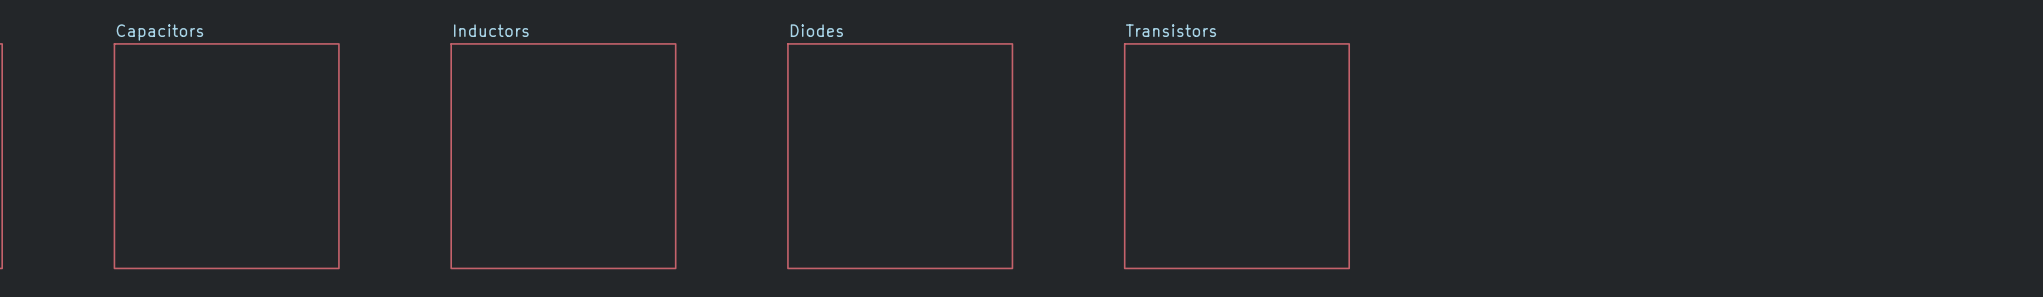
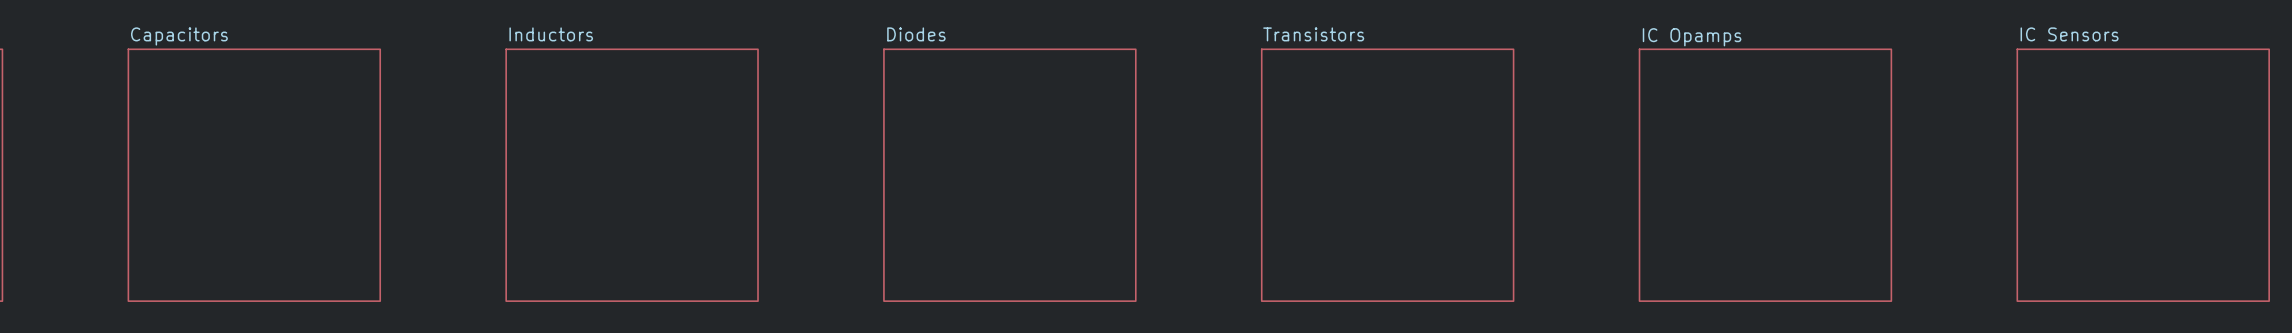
sheet IC Opamps: none -> (1765, 175)
sheet IC Sensors: none -> (2143, 175)

